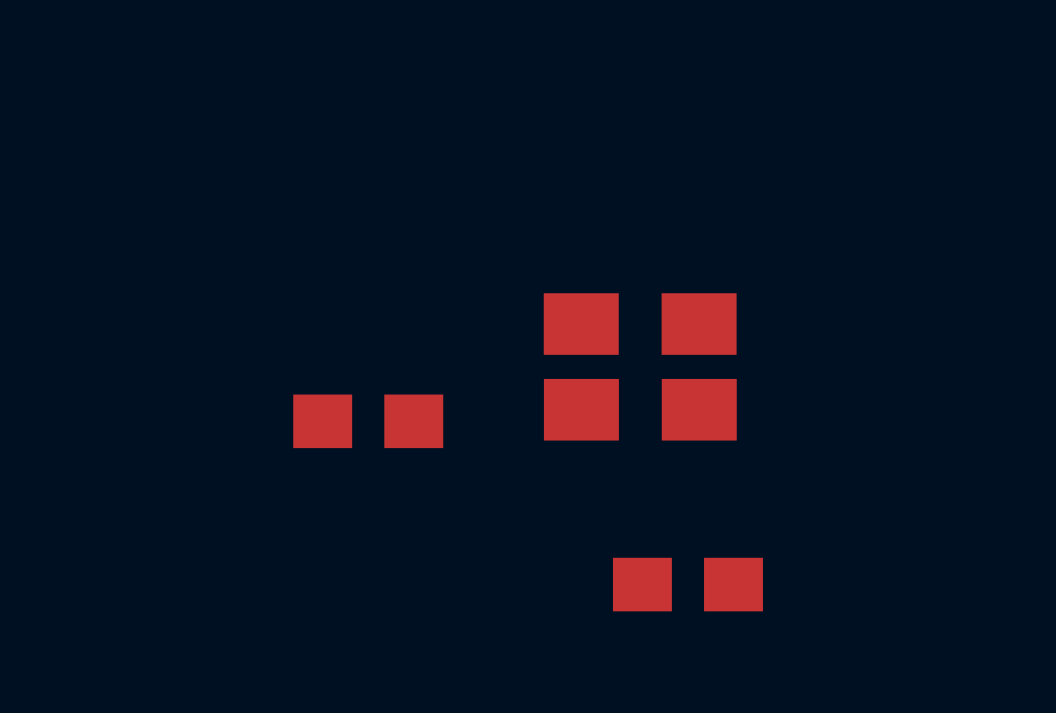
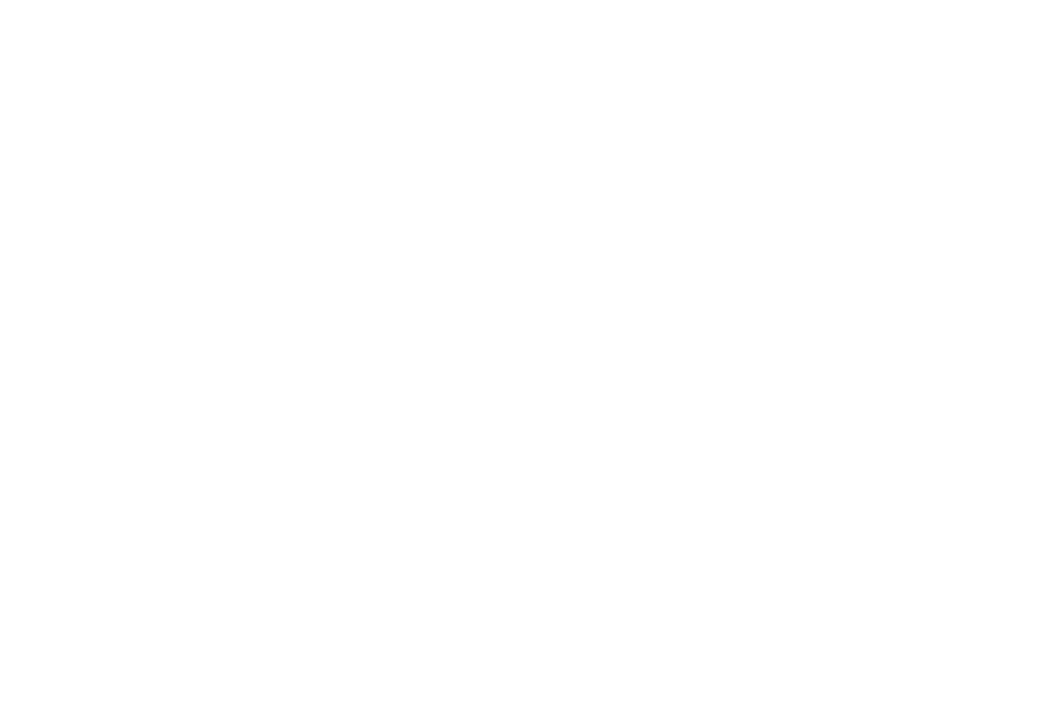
part: (640, 366) -> none
part: (368, 421) -> none
part: (687, 584) -> none

